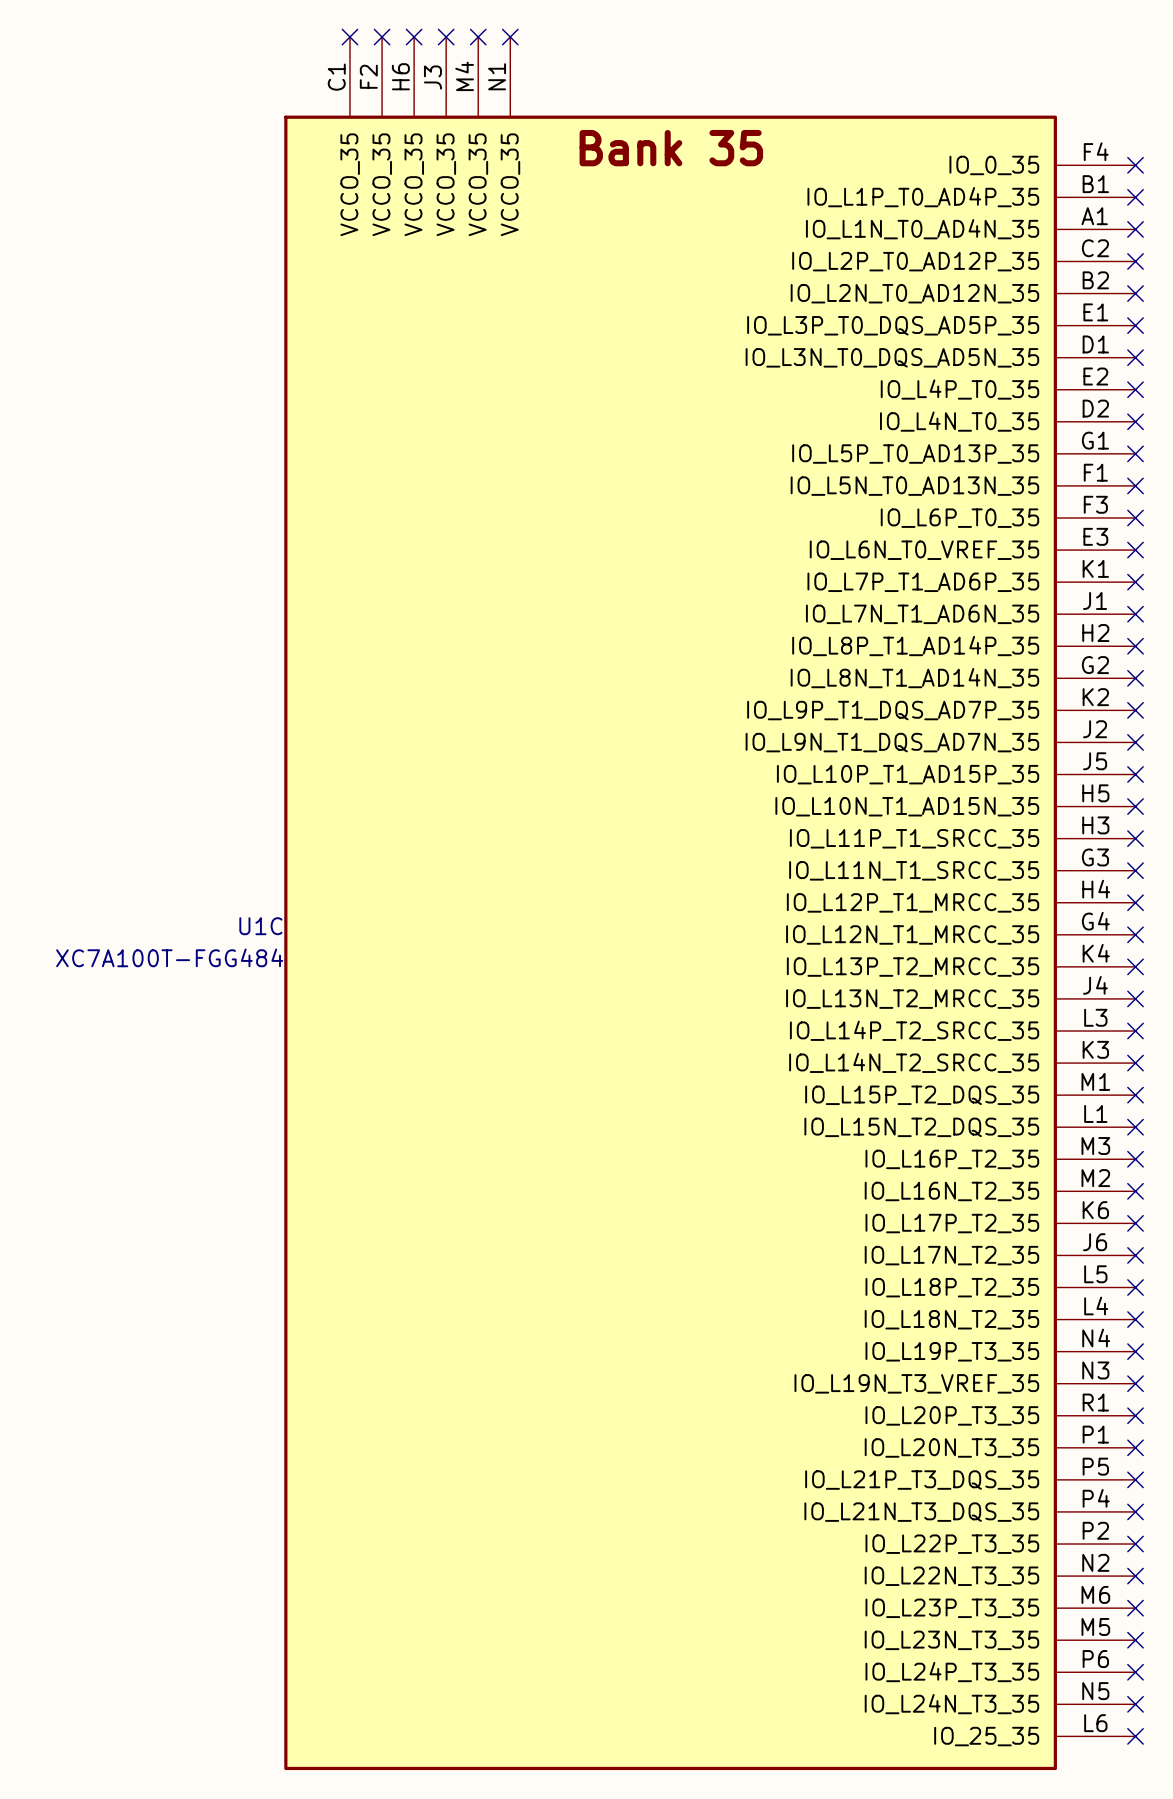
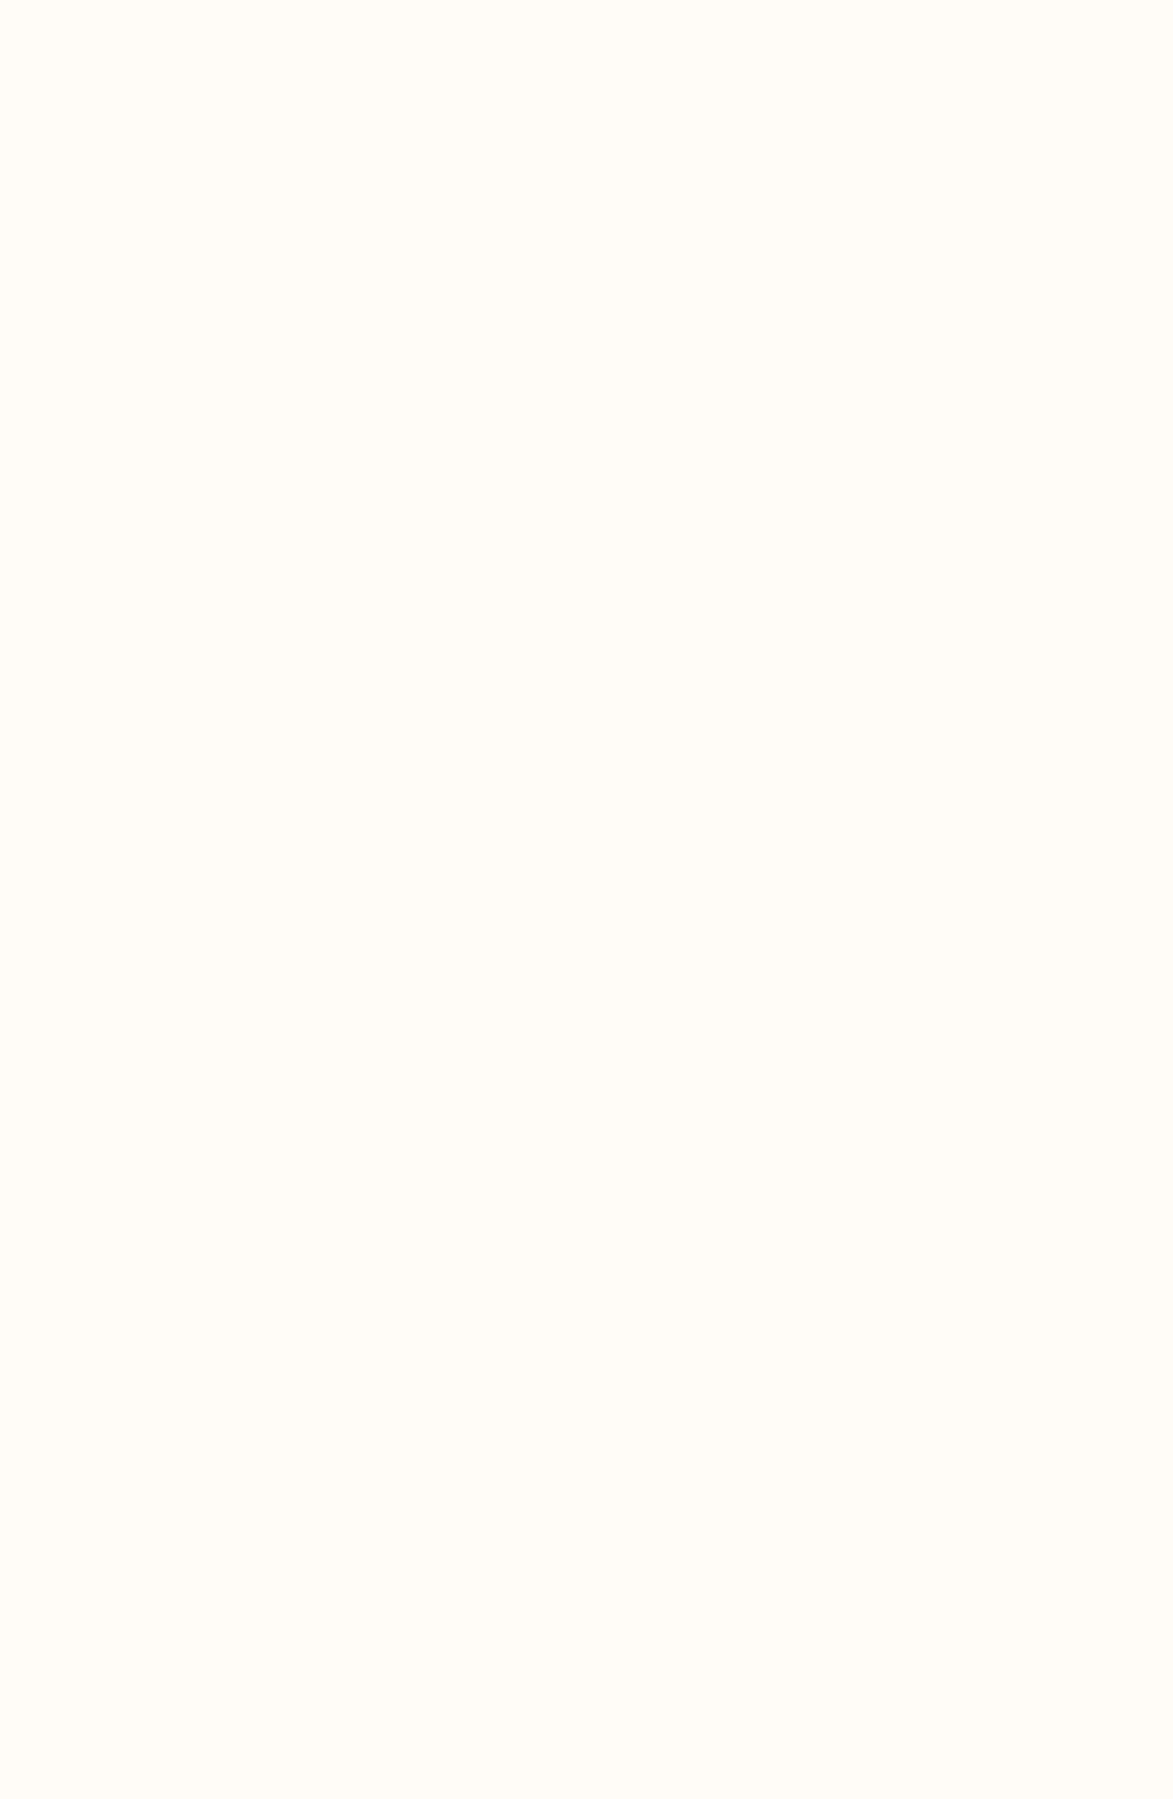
no-connect mark: (349, 37) -> none
no-connect mark: (382, 37) -> none
no-connect mark: (414, 37) -> none
no-connect mark: (446, 37) -> none
no-connect mark: (478, 37) -> none
no-connect mark: (510, 37) -> none
no-connect mark: (1135, 165) -> none
no-connect mark: (1135, 197) -> none
no-connect mark: (1135, 229) -> none
no-connect mark: (1135, 261) -> none
no-connect mark: (1135, 293) -> none
no-connect mark: (1135, 325) -> none
no-connect mark: (1135, 357) -> none
no-connect mark: (1135, 389) -> none
no-connect mark: (1135, 421) -> none
no-connect mark: (1135, 453) -> none
no-connect mark: (1135, 485) -> none
no-connect mark: (1135, 517) -> none
no-connect mark: (1135, 550) -> none
no-connect mark: (1135, 582) -> none
no-connect mark: (1135, 614) -> none
no-connect mark: (1135, 646) -> none
no-connect mark: (1135, 678) -> none
no-connect mark: (1135, 710) -> none
no-connect mark: (1135, 742) -> none
no-connect mark: (1135, 774) -> none
no-connect mark: (1135, 806) -> none
no-connect mark: (1135, 838) -> none
no-connect mark: (1135, 870) -> none
no-connect mark: (1135, 902) -> none
U1C: XC7A100T-FGG484 (709, 903) -> none
no-connect mark: (1135, 934) -> none
no-connect mark: (1135, 966) -> none
no-connect mark: (1135, 998) -> none
no-connect mark: (1135, 1031) -> none
no-connect mark: (1135, 1063) -> none
no-connect mark: (1135, 1095) -> none
no-connect mark: (1135, 1127) -> none
no-connect mark: (1135, 1159) -> none
no-connect mark: (1135, 1191) -> none
no-connect mark: (1135, 1223) -> none
no-connect mark: (1135, 1255) -> none
no-connect mark: (1135, 1287) -> none
no-connect mark: (1135, 1319) -> none
no-connect mark: (1135, 1351) -> none
no-connect mark: (1135, 1383) -> none
no-connect mark: (1135, 1415) -> none
no-connect mark: (1135, 1447) -> none
no-connect mark: (1135, 1479) -> none
no-connect mark: (1135, 1511) -> none
no-connect mark: (1135, 1544) -> none
no-connect mark: (1135, 1576) -> none
no-connect mark: (1135, 1608) -> none
no-connect mark: (1135, 1640) -> none
no-connect mark: (1135, 1672) -> none
no-connect mark: (1135, 1704) -> none
no-connect mark: (1135, 1736) -> none

